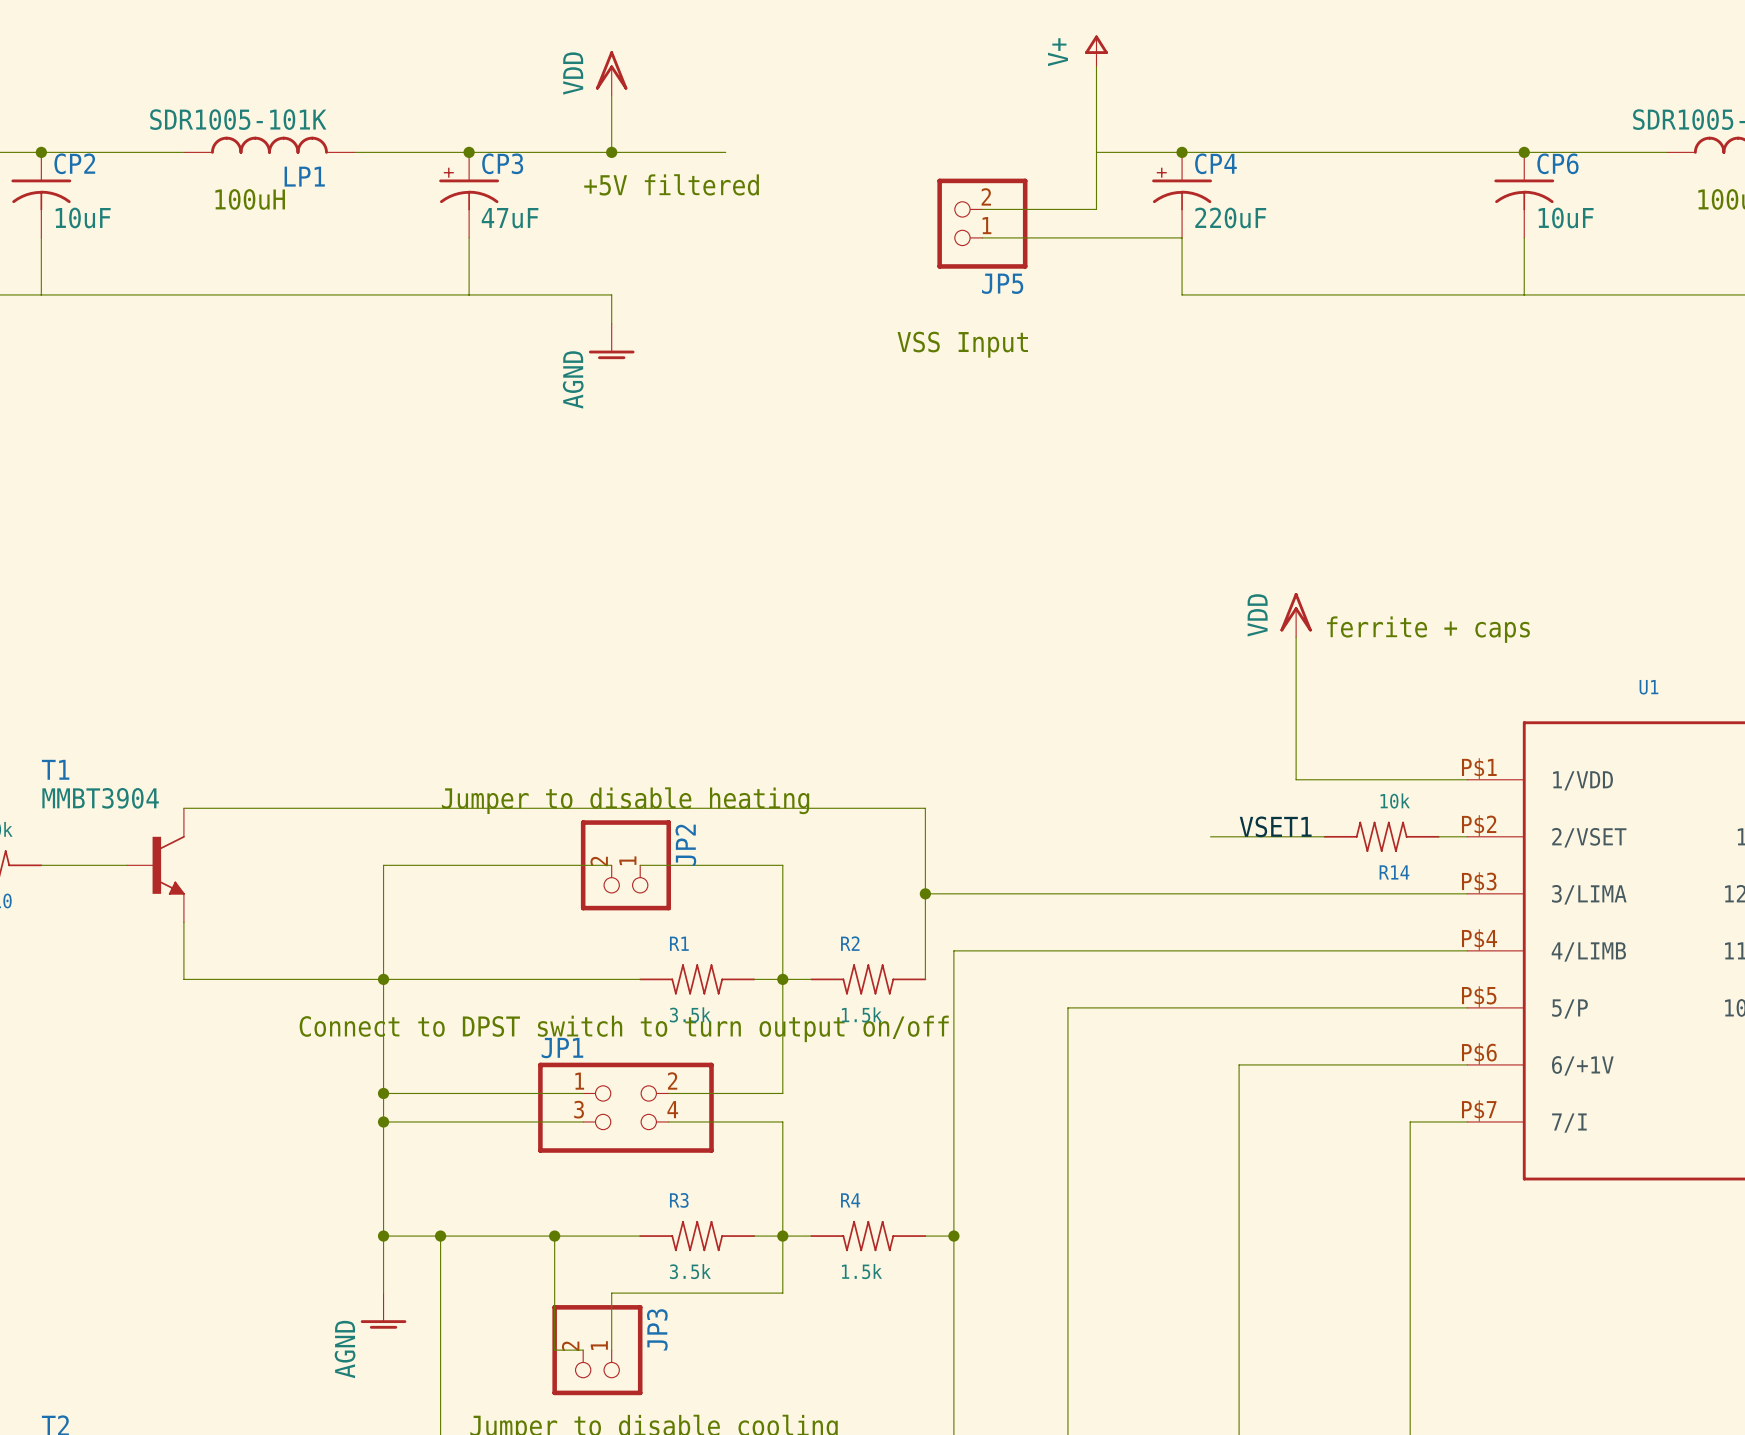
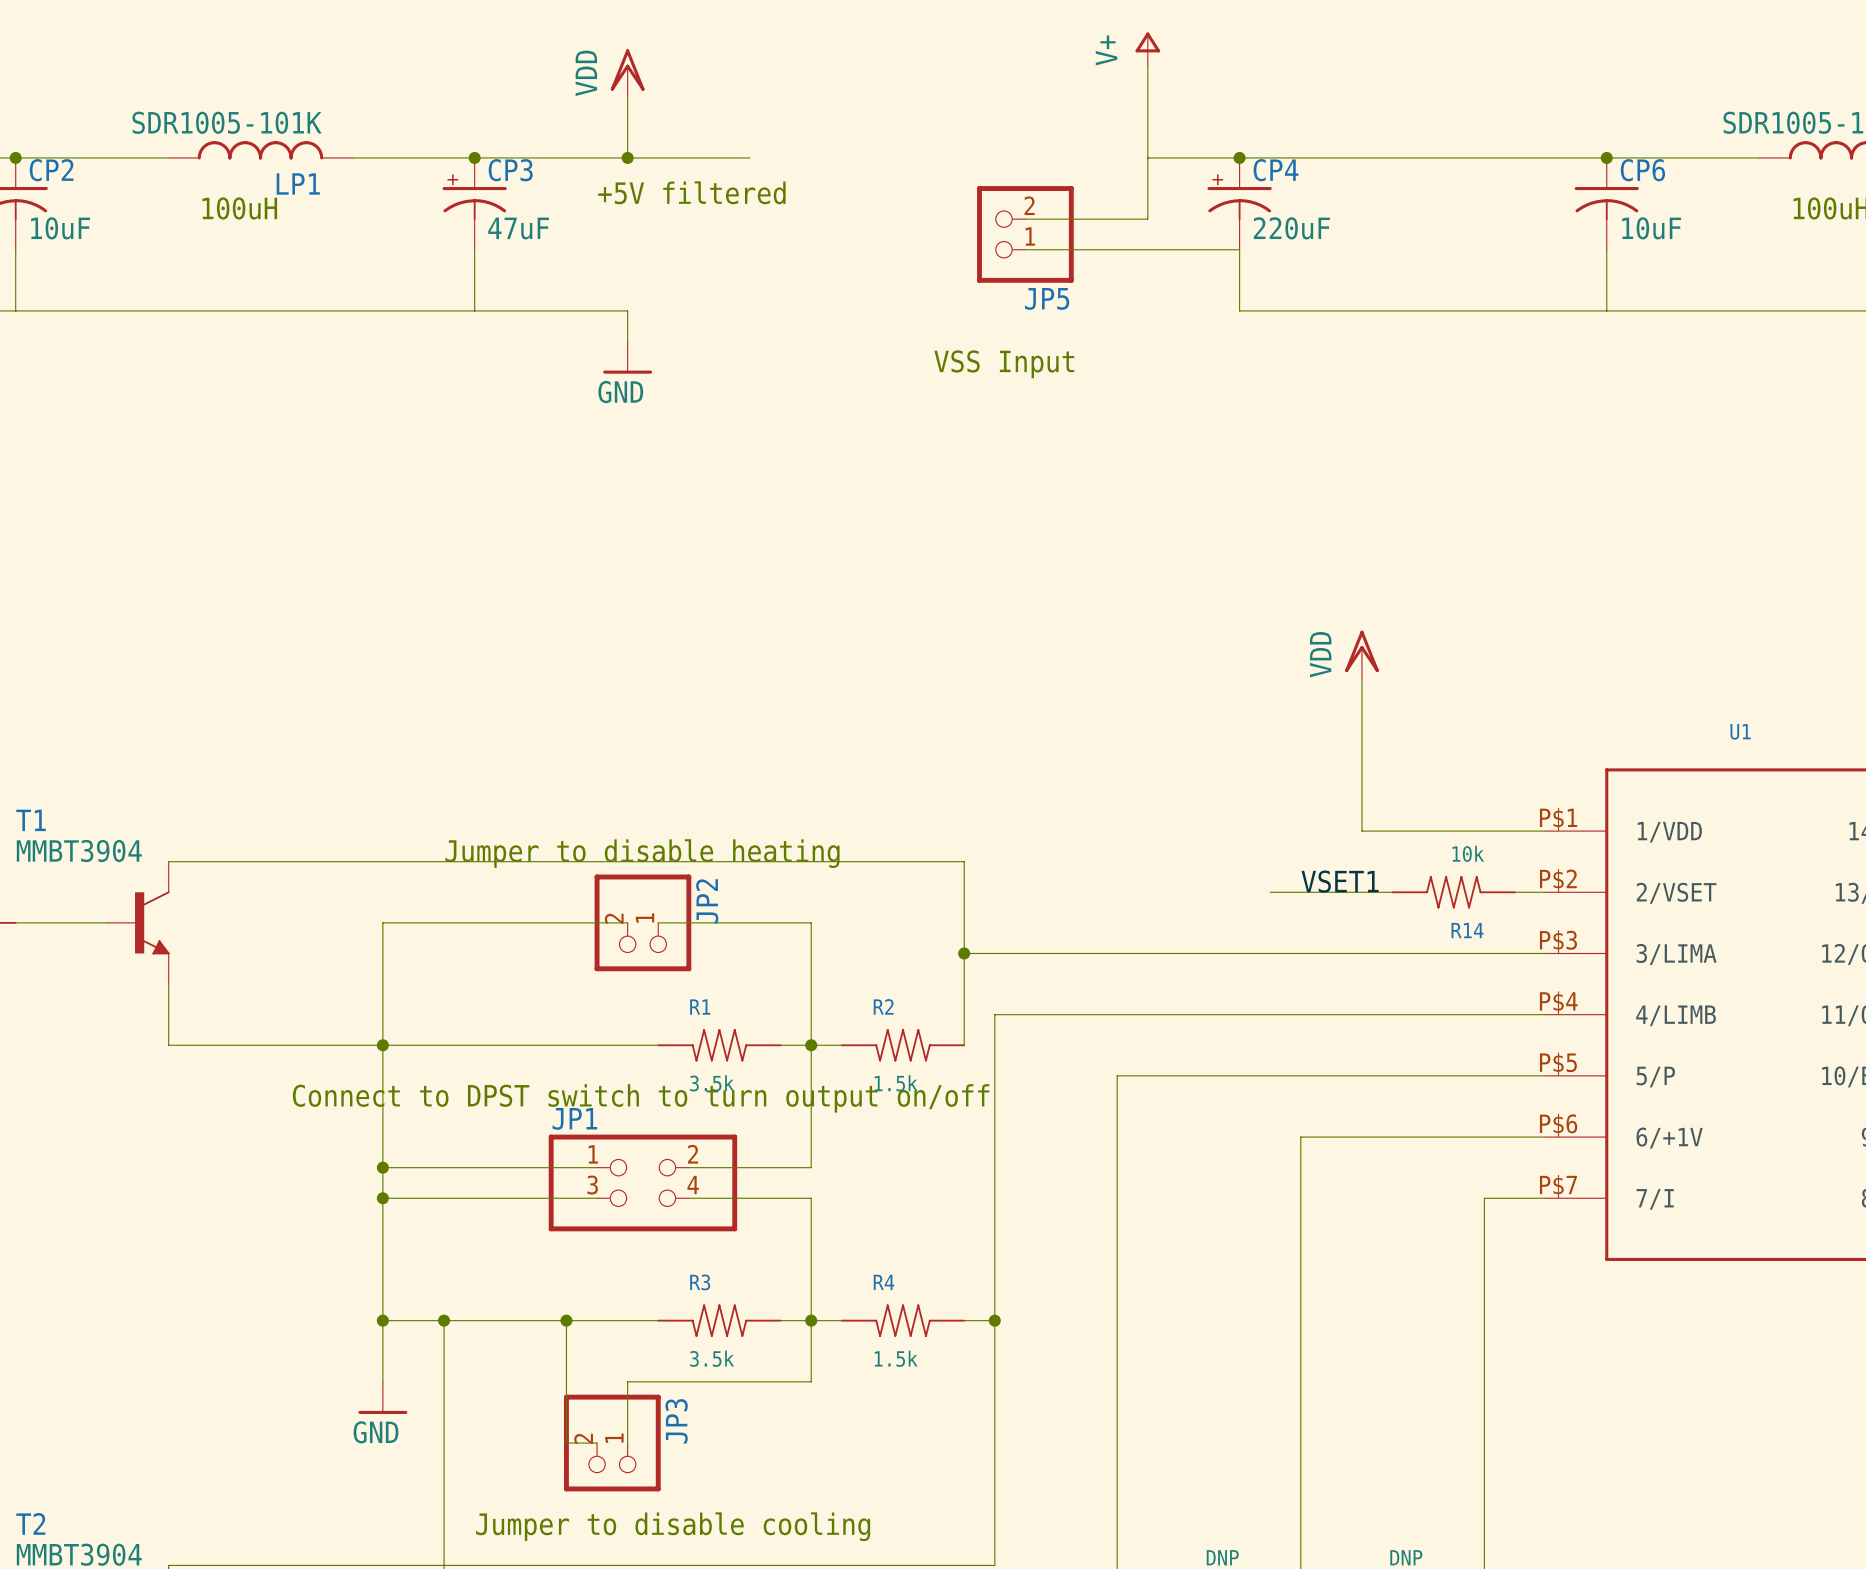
power symbol: AGND (611, 341) -> GND (627, 357)
text: ferrite + caps (1428, 629) -> none
power symbol: AGND (383, 1310) -> GND (382, 1397)

